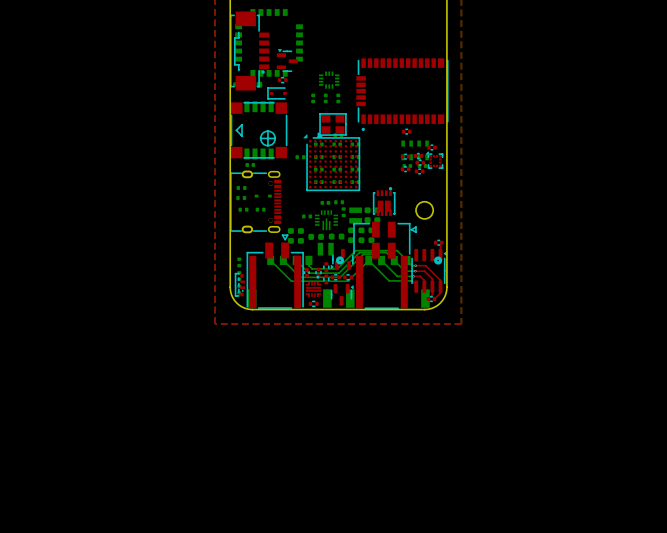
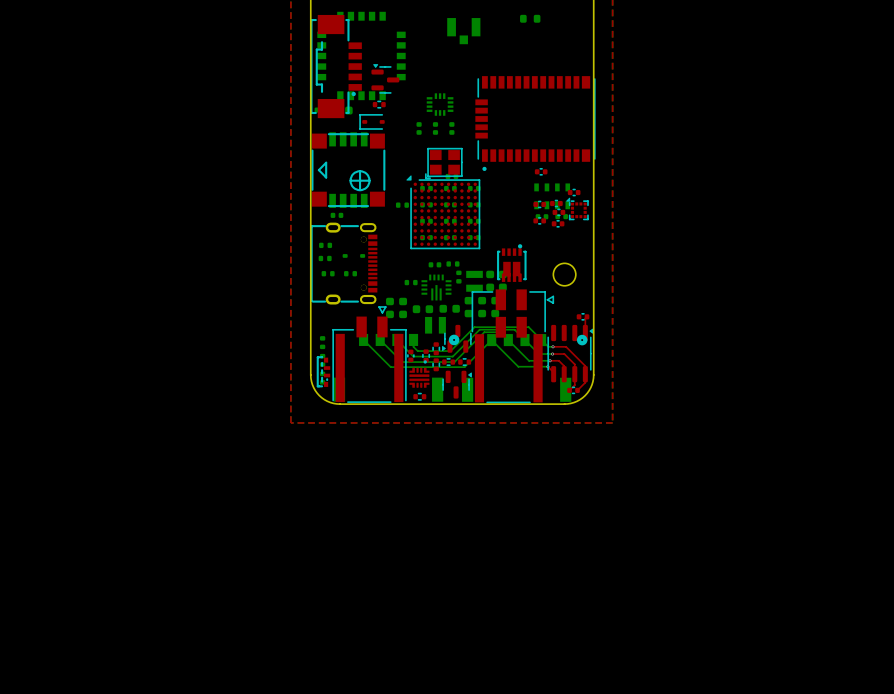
part: none -> (530, 18)
part: none -> (463, 31)

